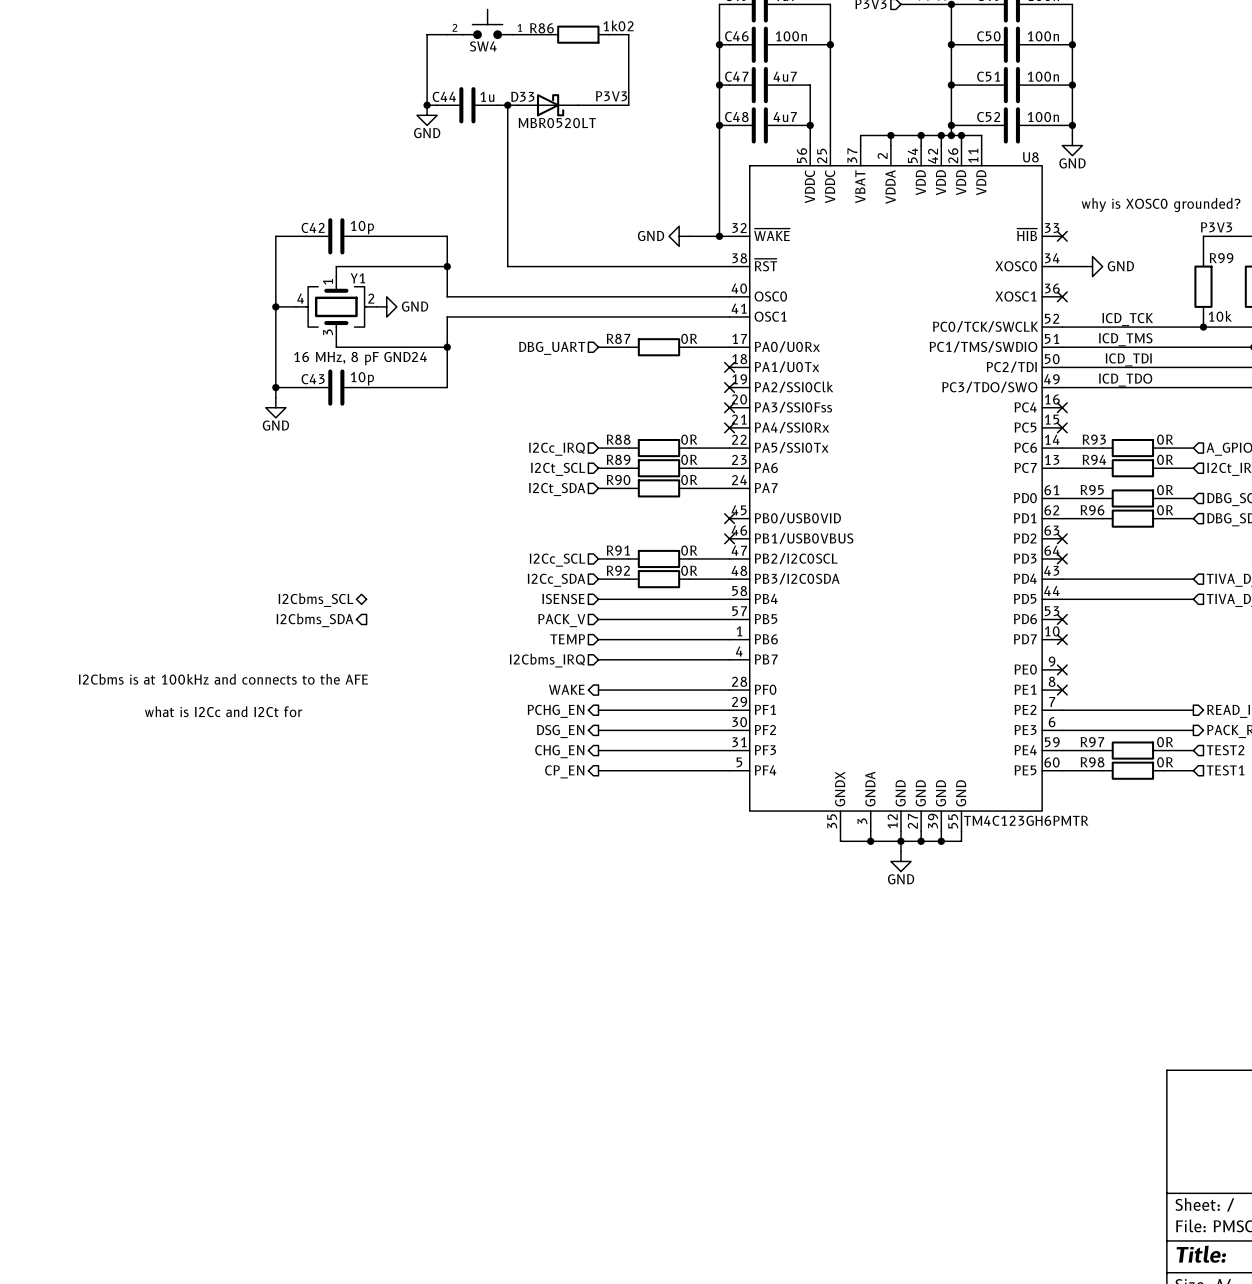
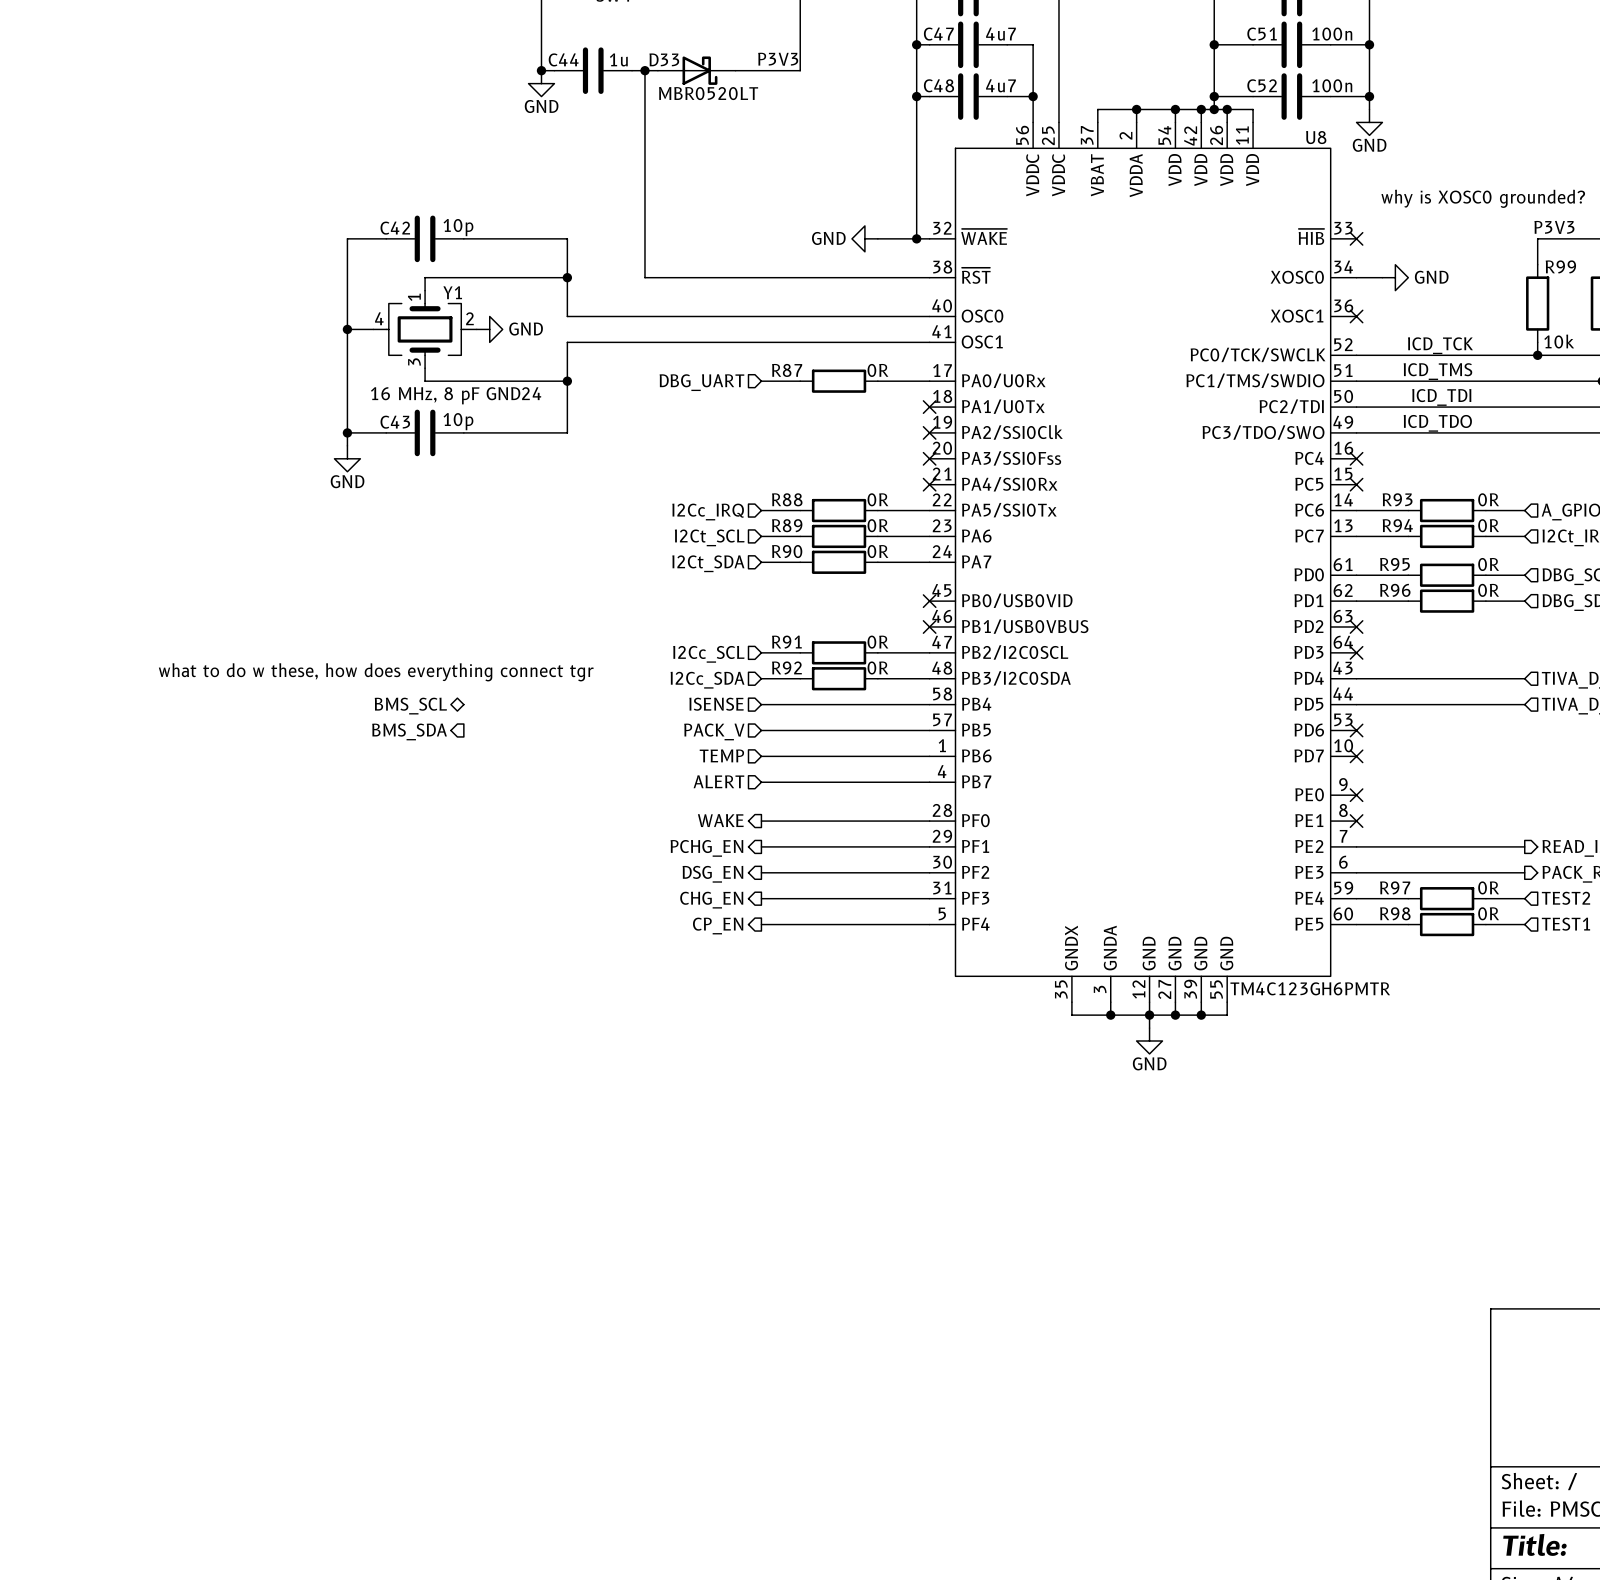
text: none -> what to do w these, how does everything connect tgr (376, 672)
hierarchical label: I2Cbms_SCL (315, 600) -> BMS_SCL (410, 706)
hierarchical label: I2Cbms_SDA (314, 620) -> BMS_SDA (409, 731)
hierarchical label: I2Cbms_IRQ (547, 660) -> ALERT (718, 781)
text: I2Cbms is at 100kHz and connects to the AFE (223, 679) -> none
text: what is I2Cc and I2Ct for (223, 711) -> none

